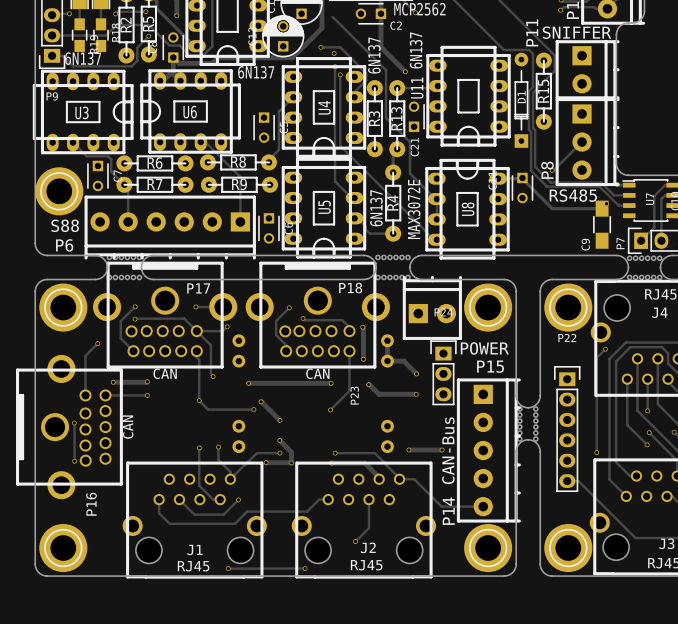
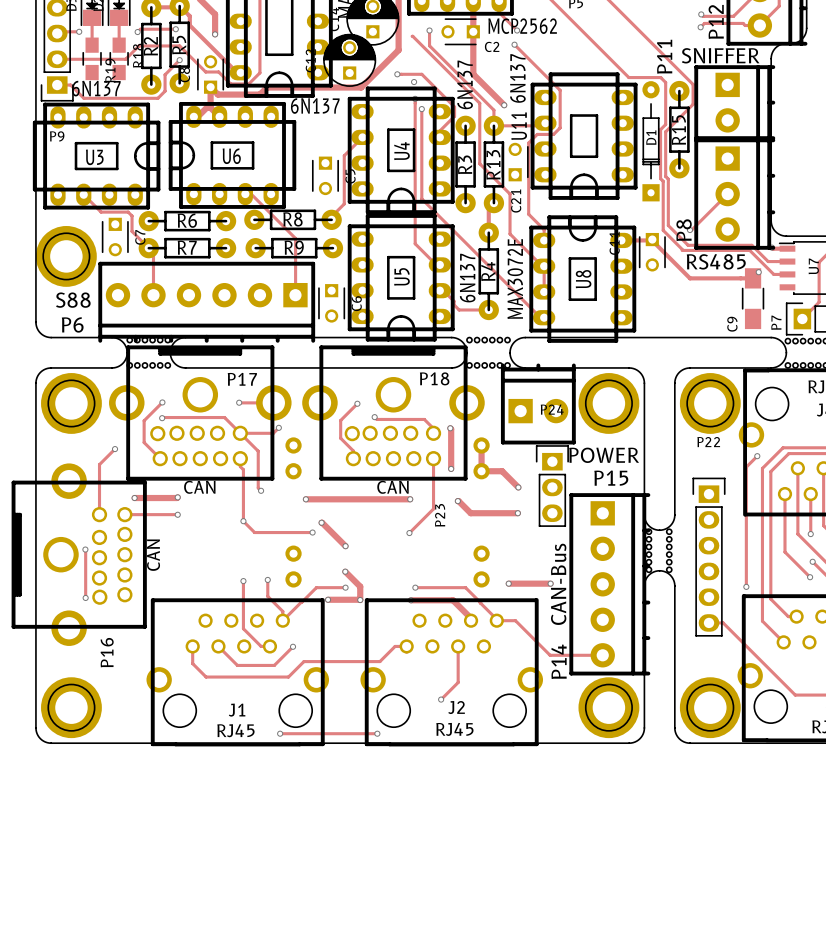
track: none -> (429, 30) (429, 45) (493, 110) (493, 125)
via: none -> (429, 30)
track: none -> (514, 44) (560, 90) (560, 127) (553, 134) (537, 134) (528, 143) (528, 214) (544, 229) (544, 240)
via: none -> (514, 44)

